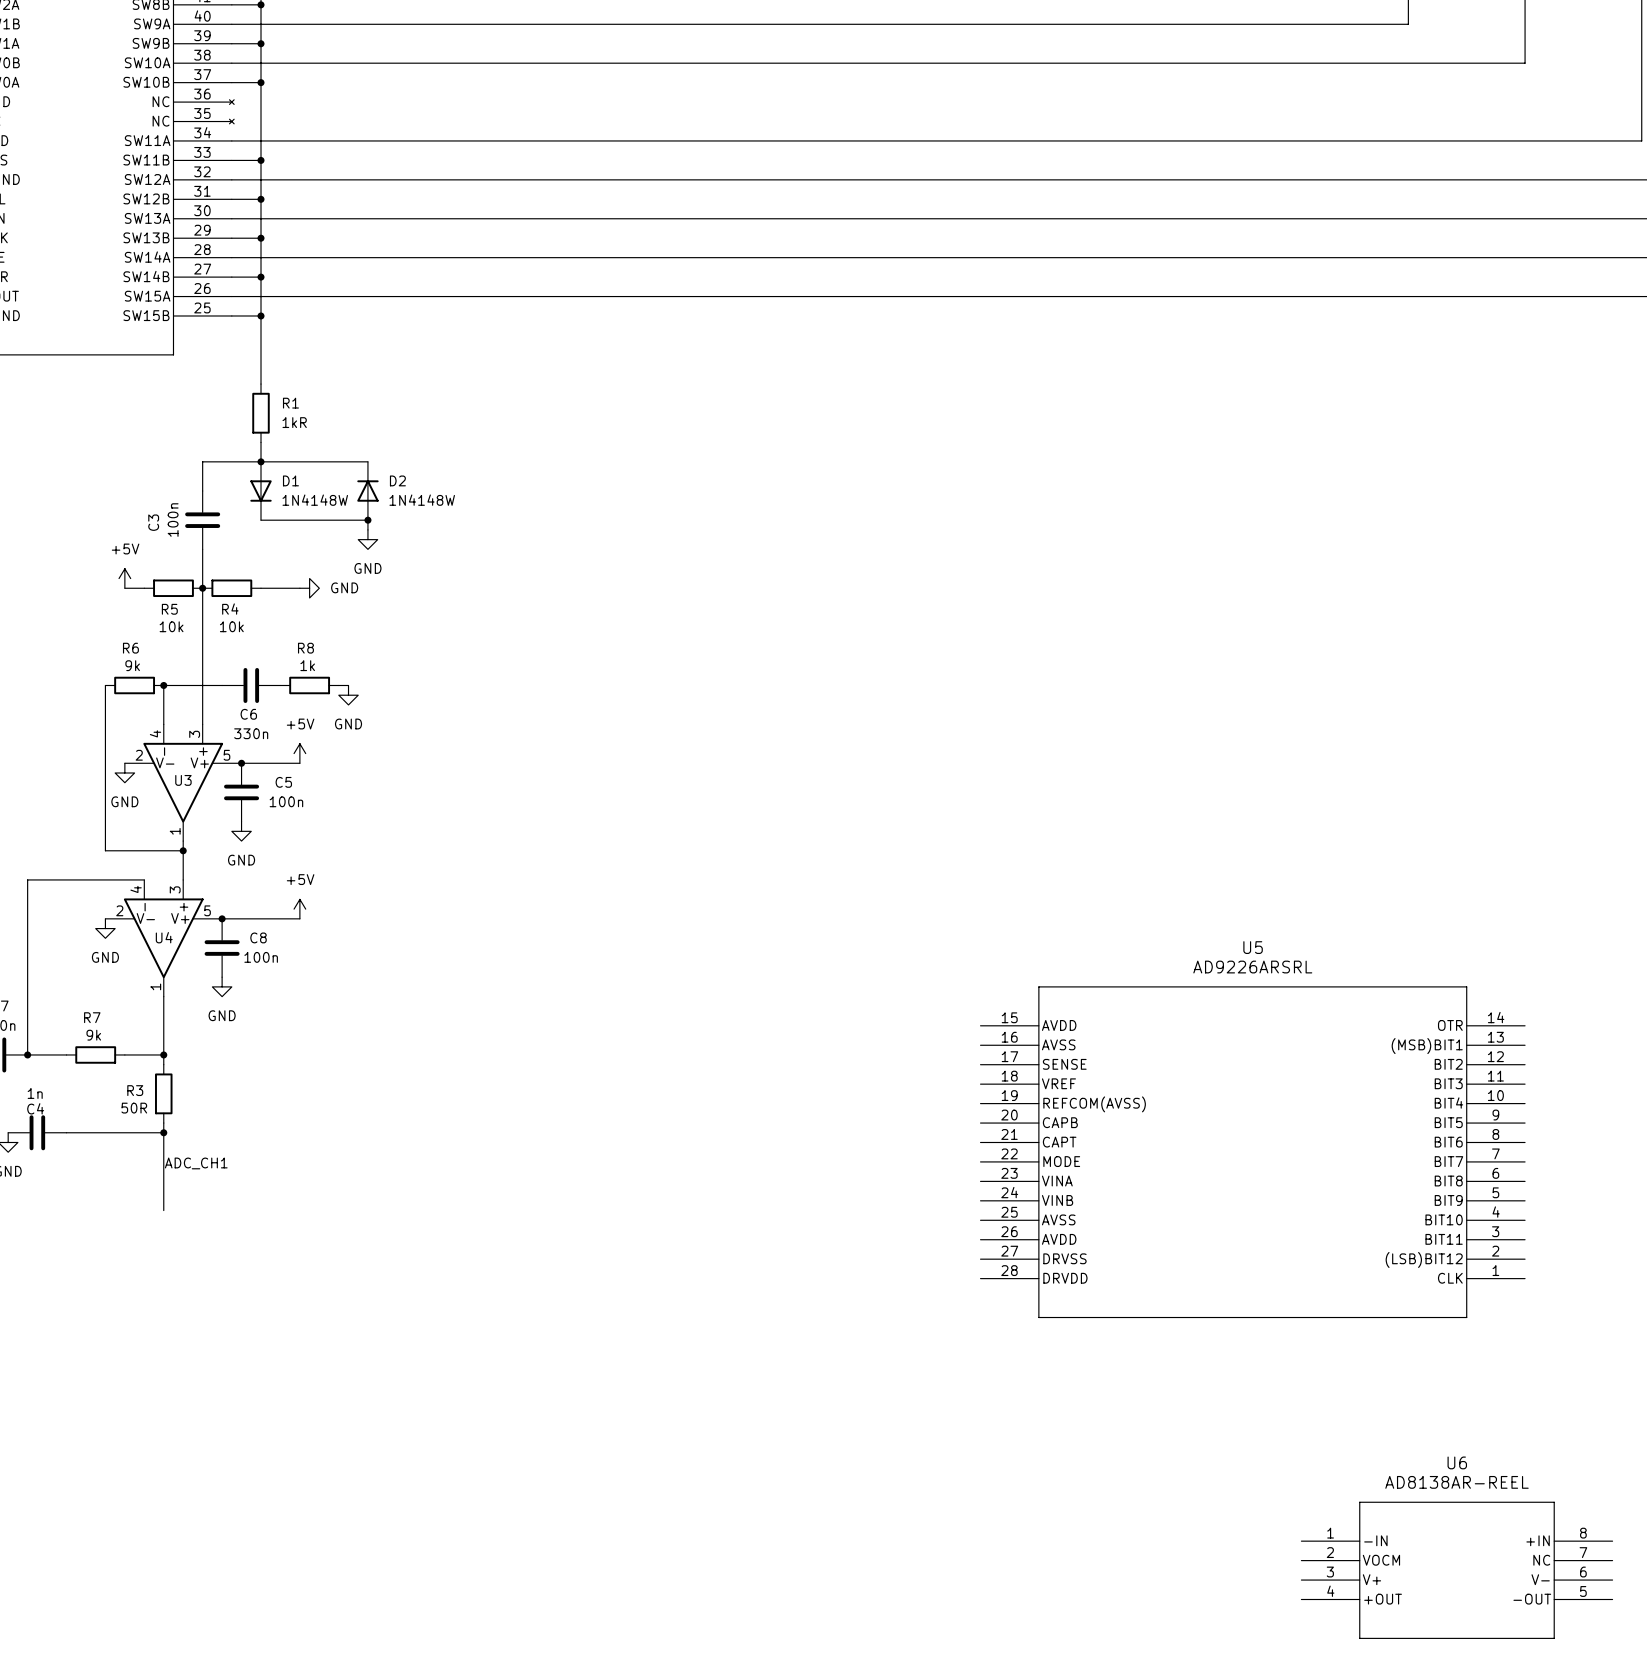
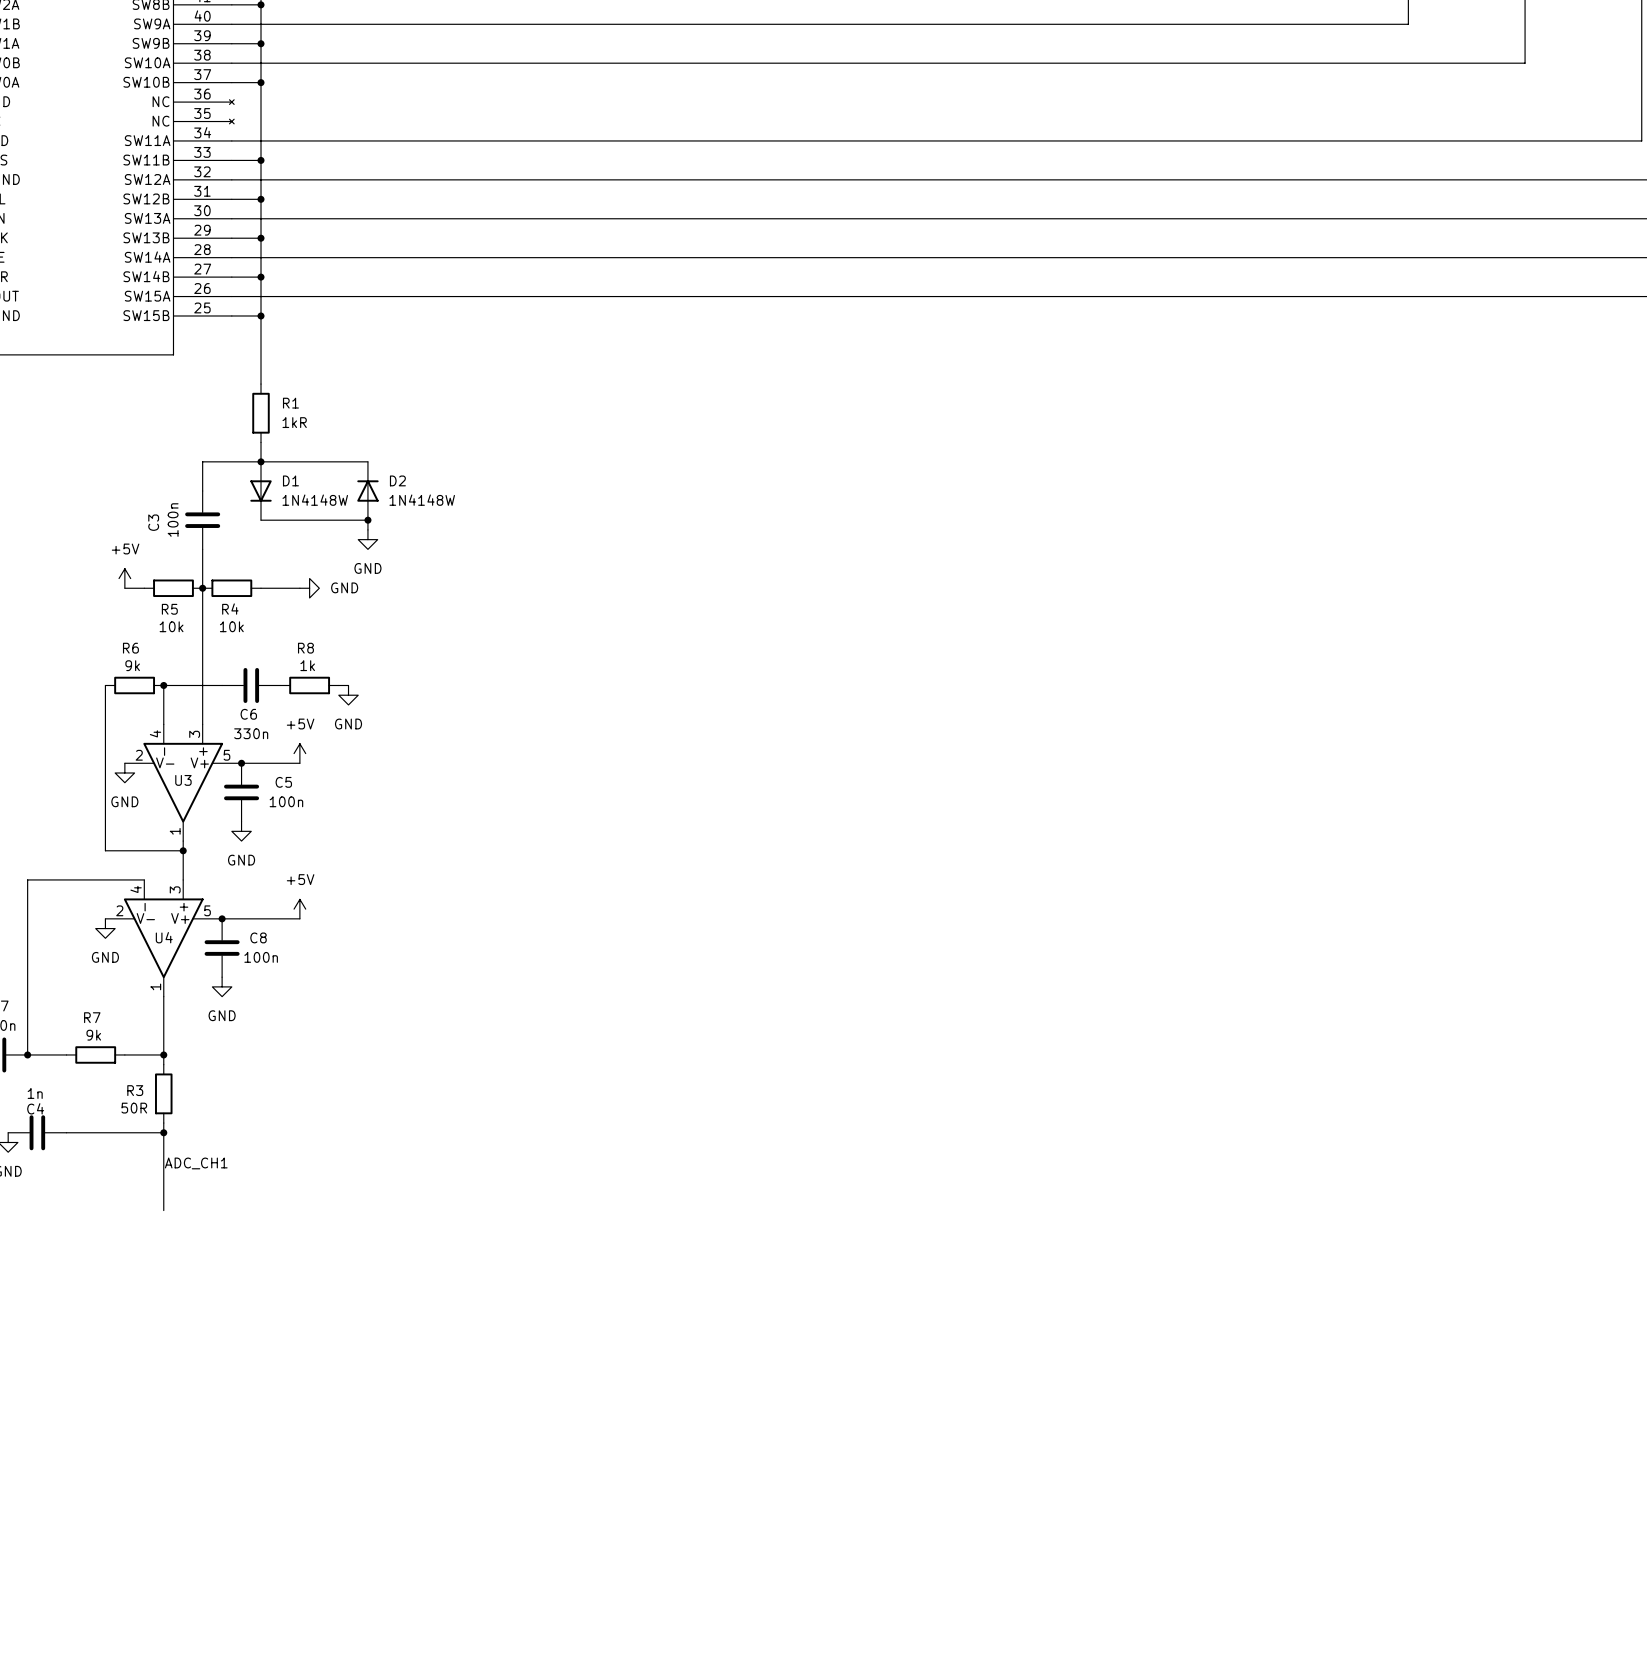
U5: AD9226ARSRL (1252, 1152) -> none
U6: AD8138AR-REEL (1456, 1570) -> none

